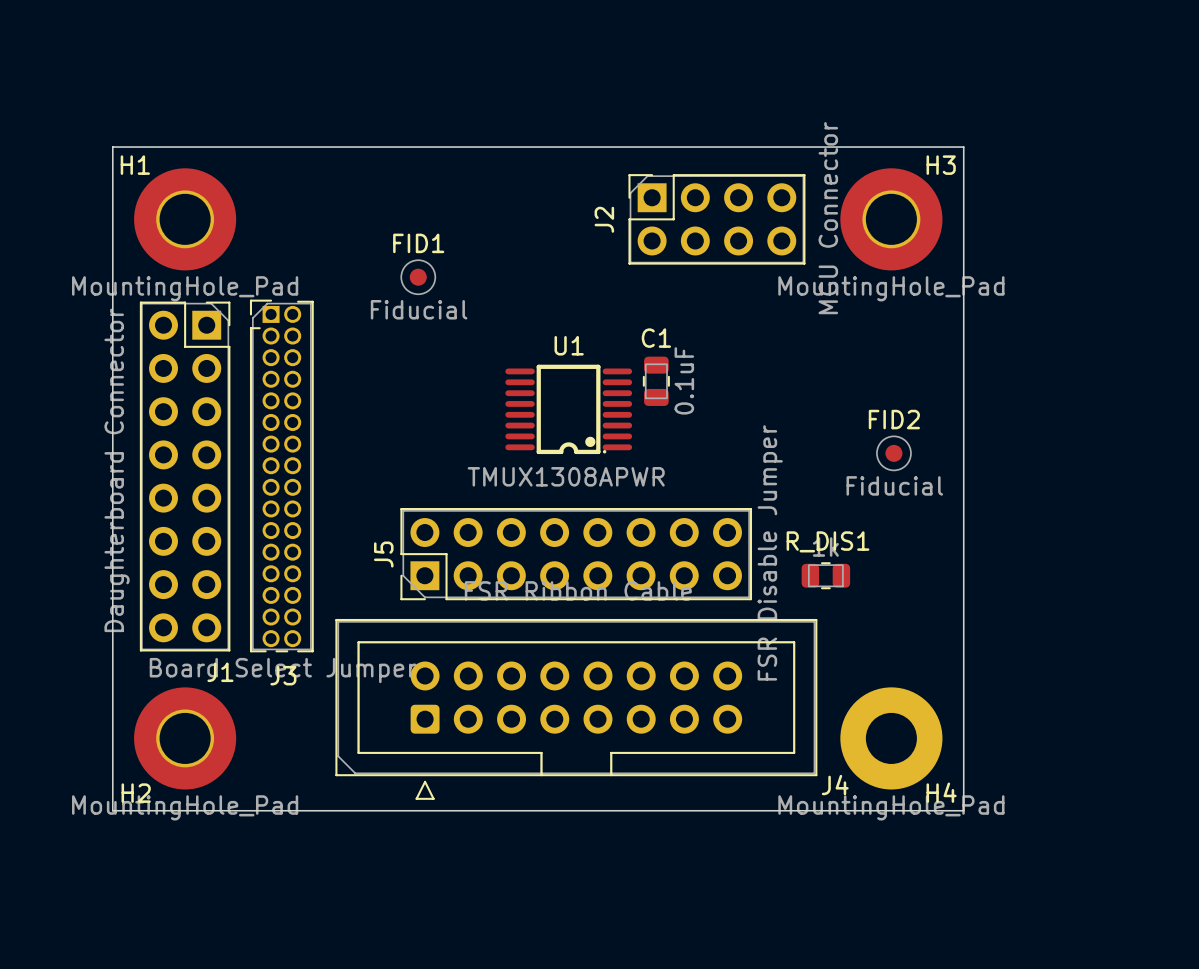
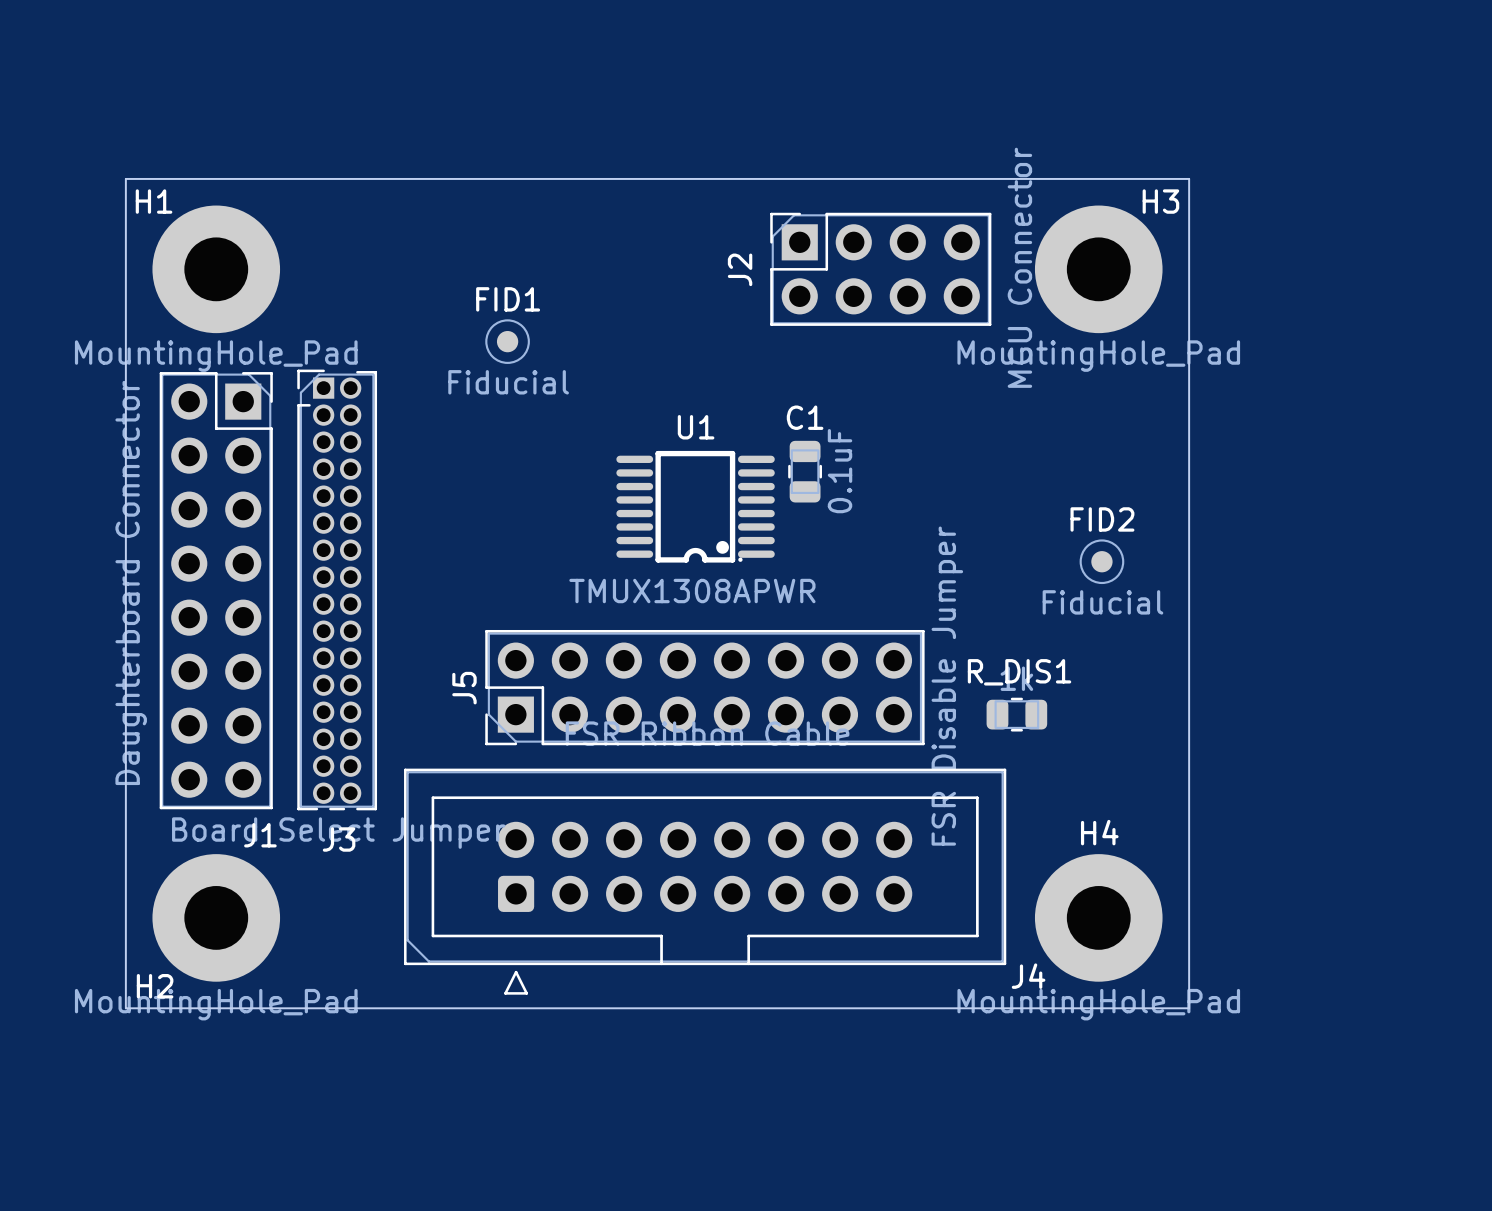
H4 footprint: [840, 687, 943, 790] -> [1034, 854, 1163, 982]
H4 name position: H4 (941, 792) -> H4 (1099, 832)

